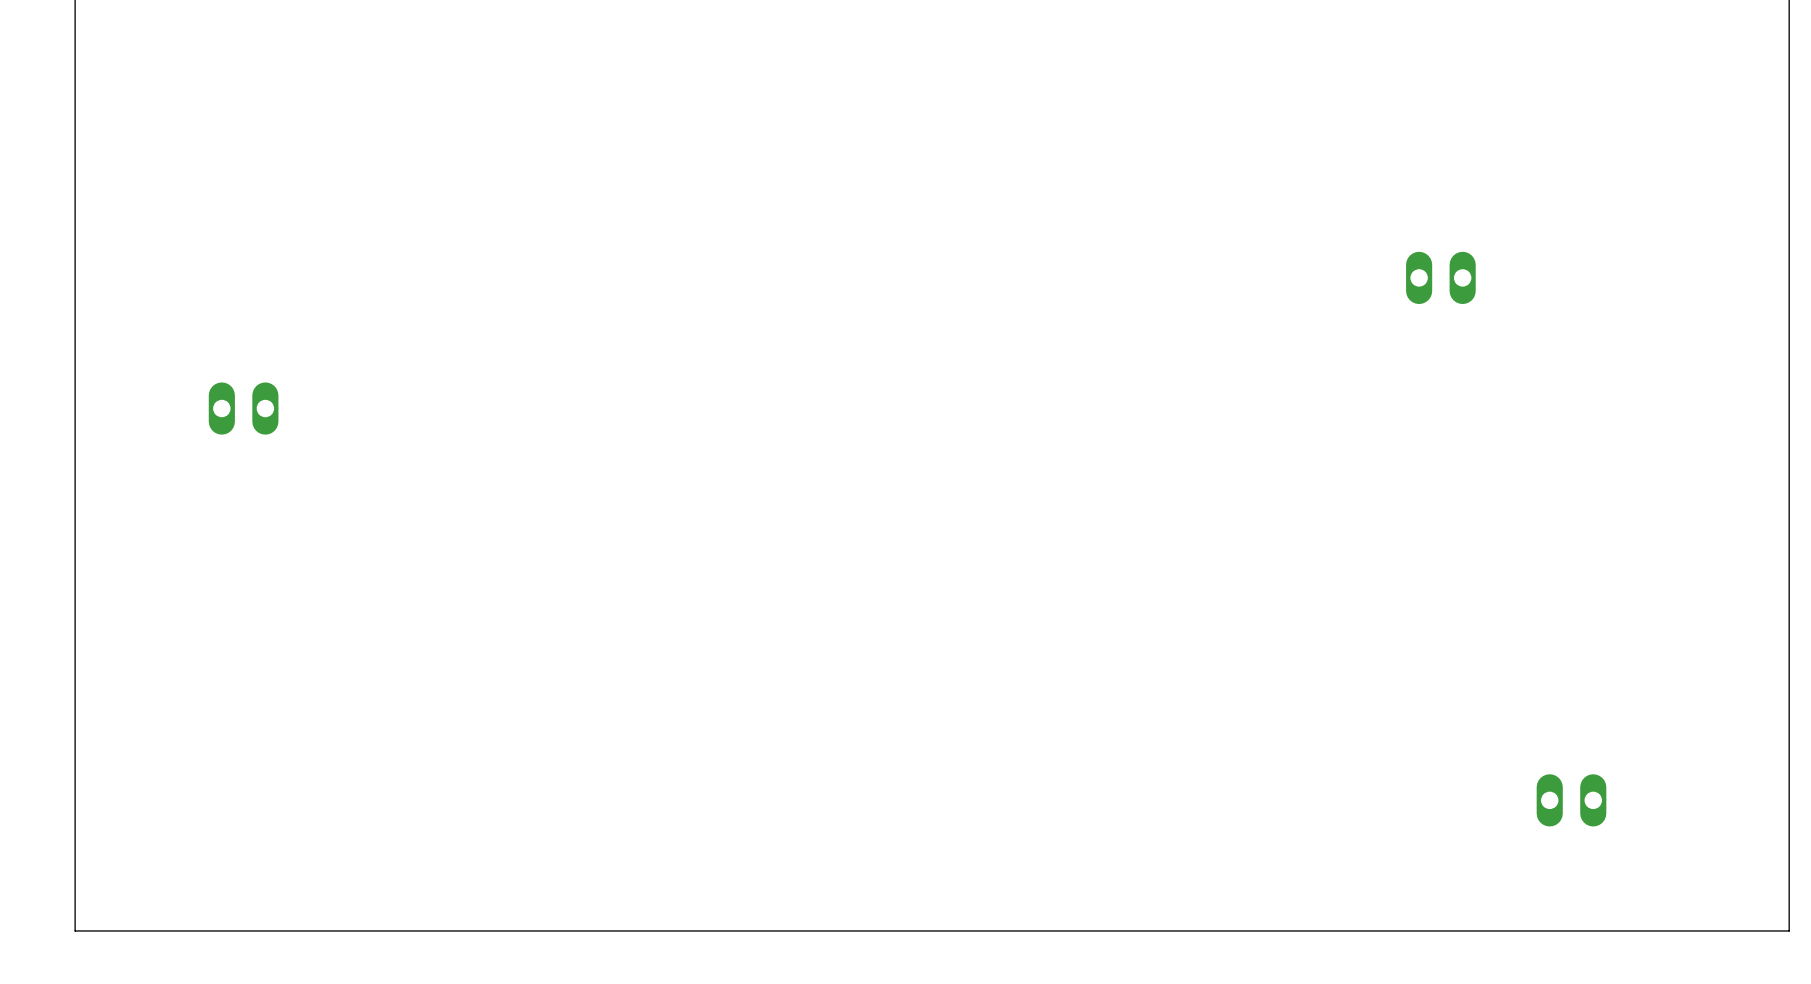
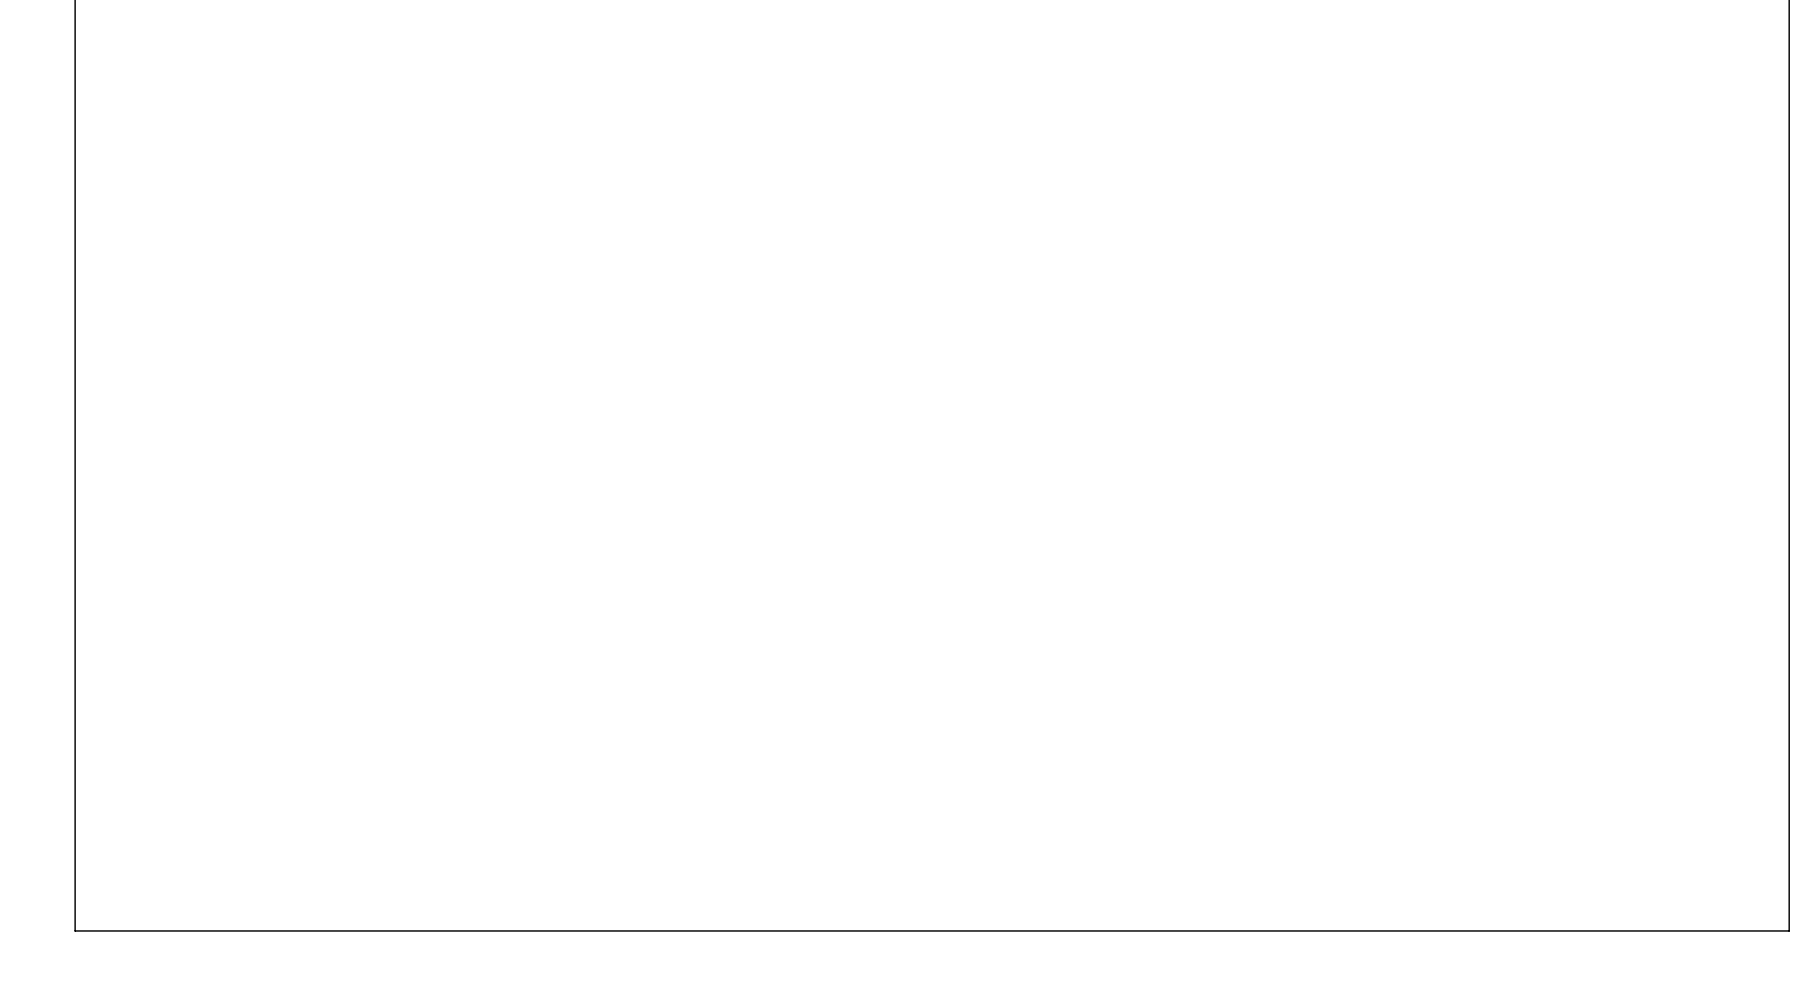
part: (1440, 277) -> none
part: (243, 408) -> none
part: (1571, 800) -> none

